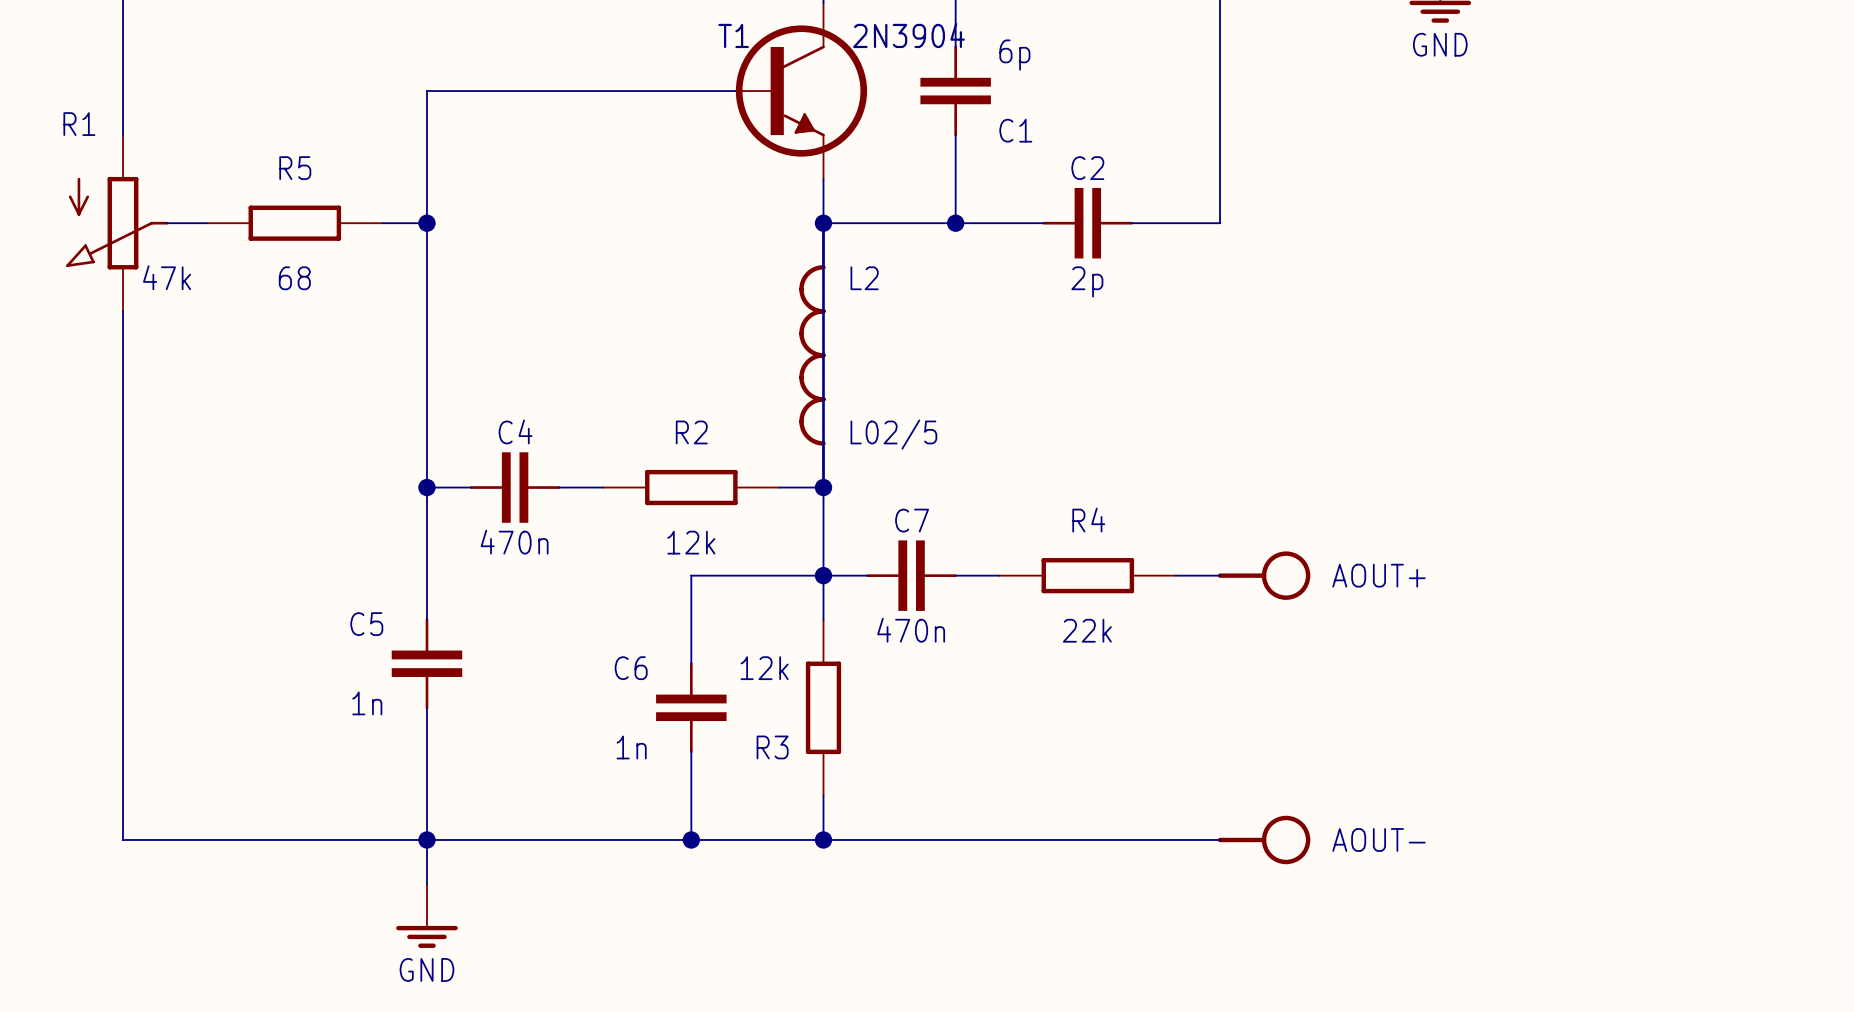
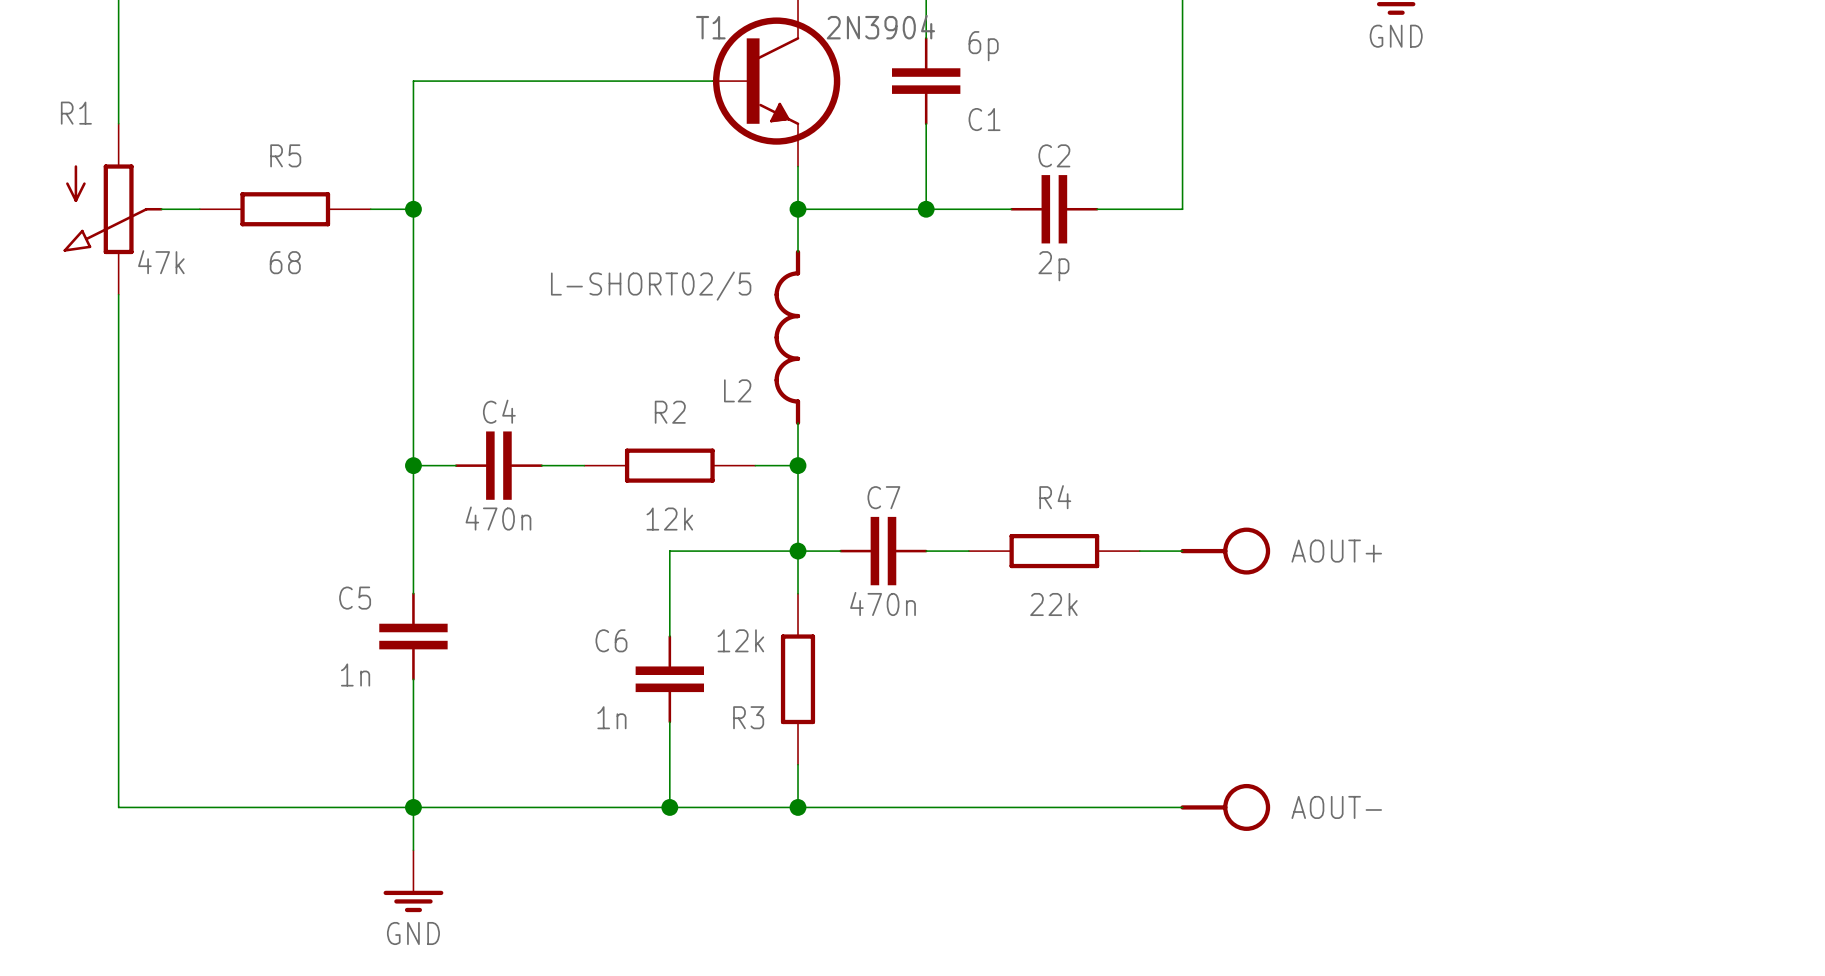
L2 symbol: [799, 223, 826, 488] -> [774, 249, 801, 426]
wire: (823, 267) (823, 443) -> none
L2 name position: L2 (864, 278) -> L2 (737, 390)
L2 value: L02/5 (893, 434) -> L-SHORT02/5 (651, 286)

